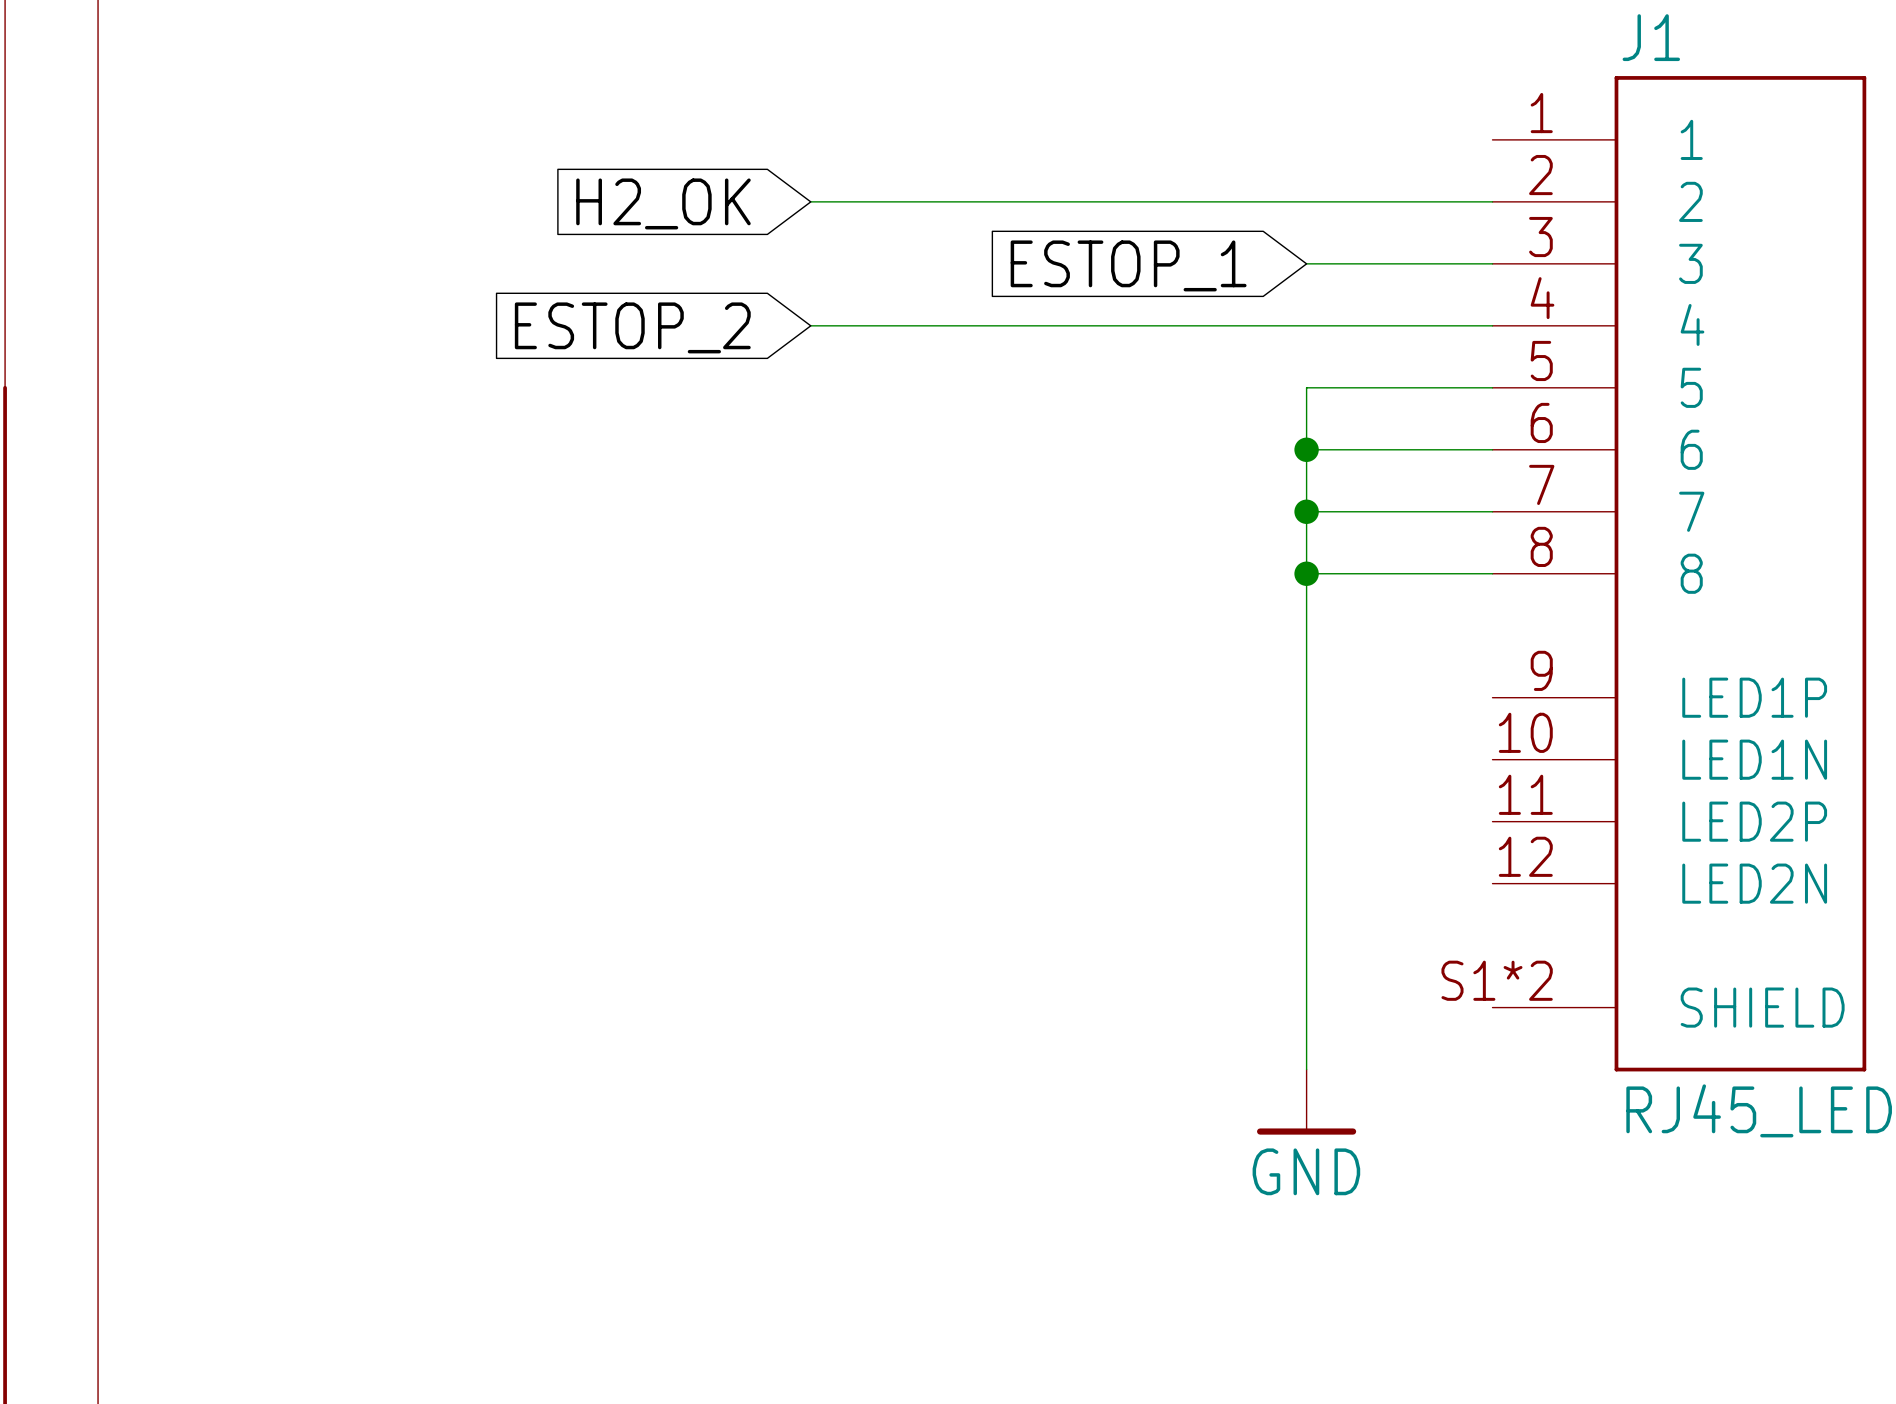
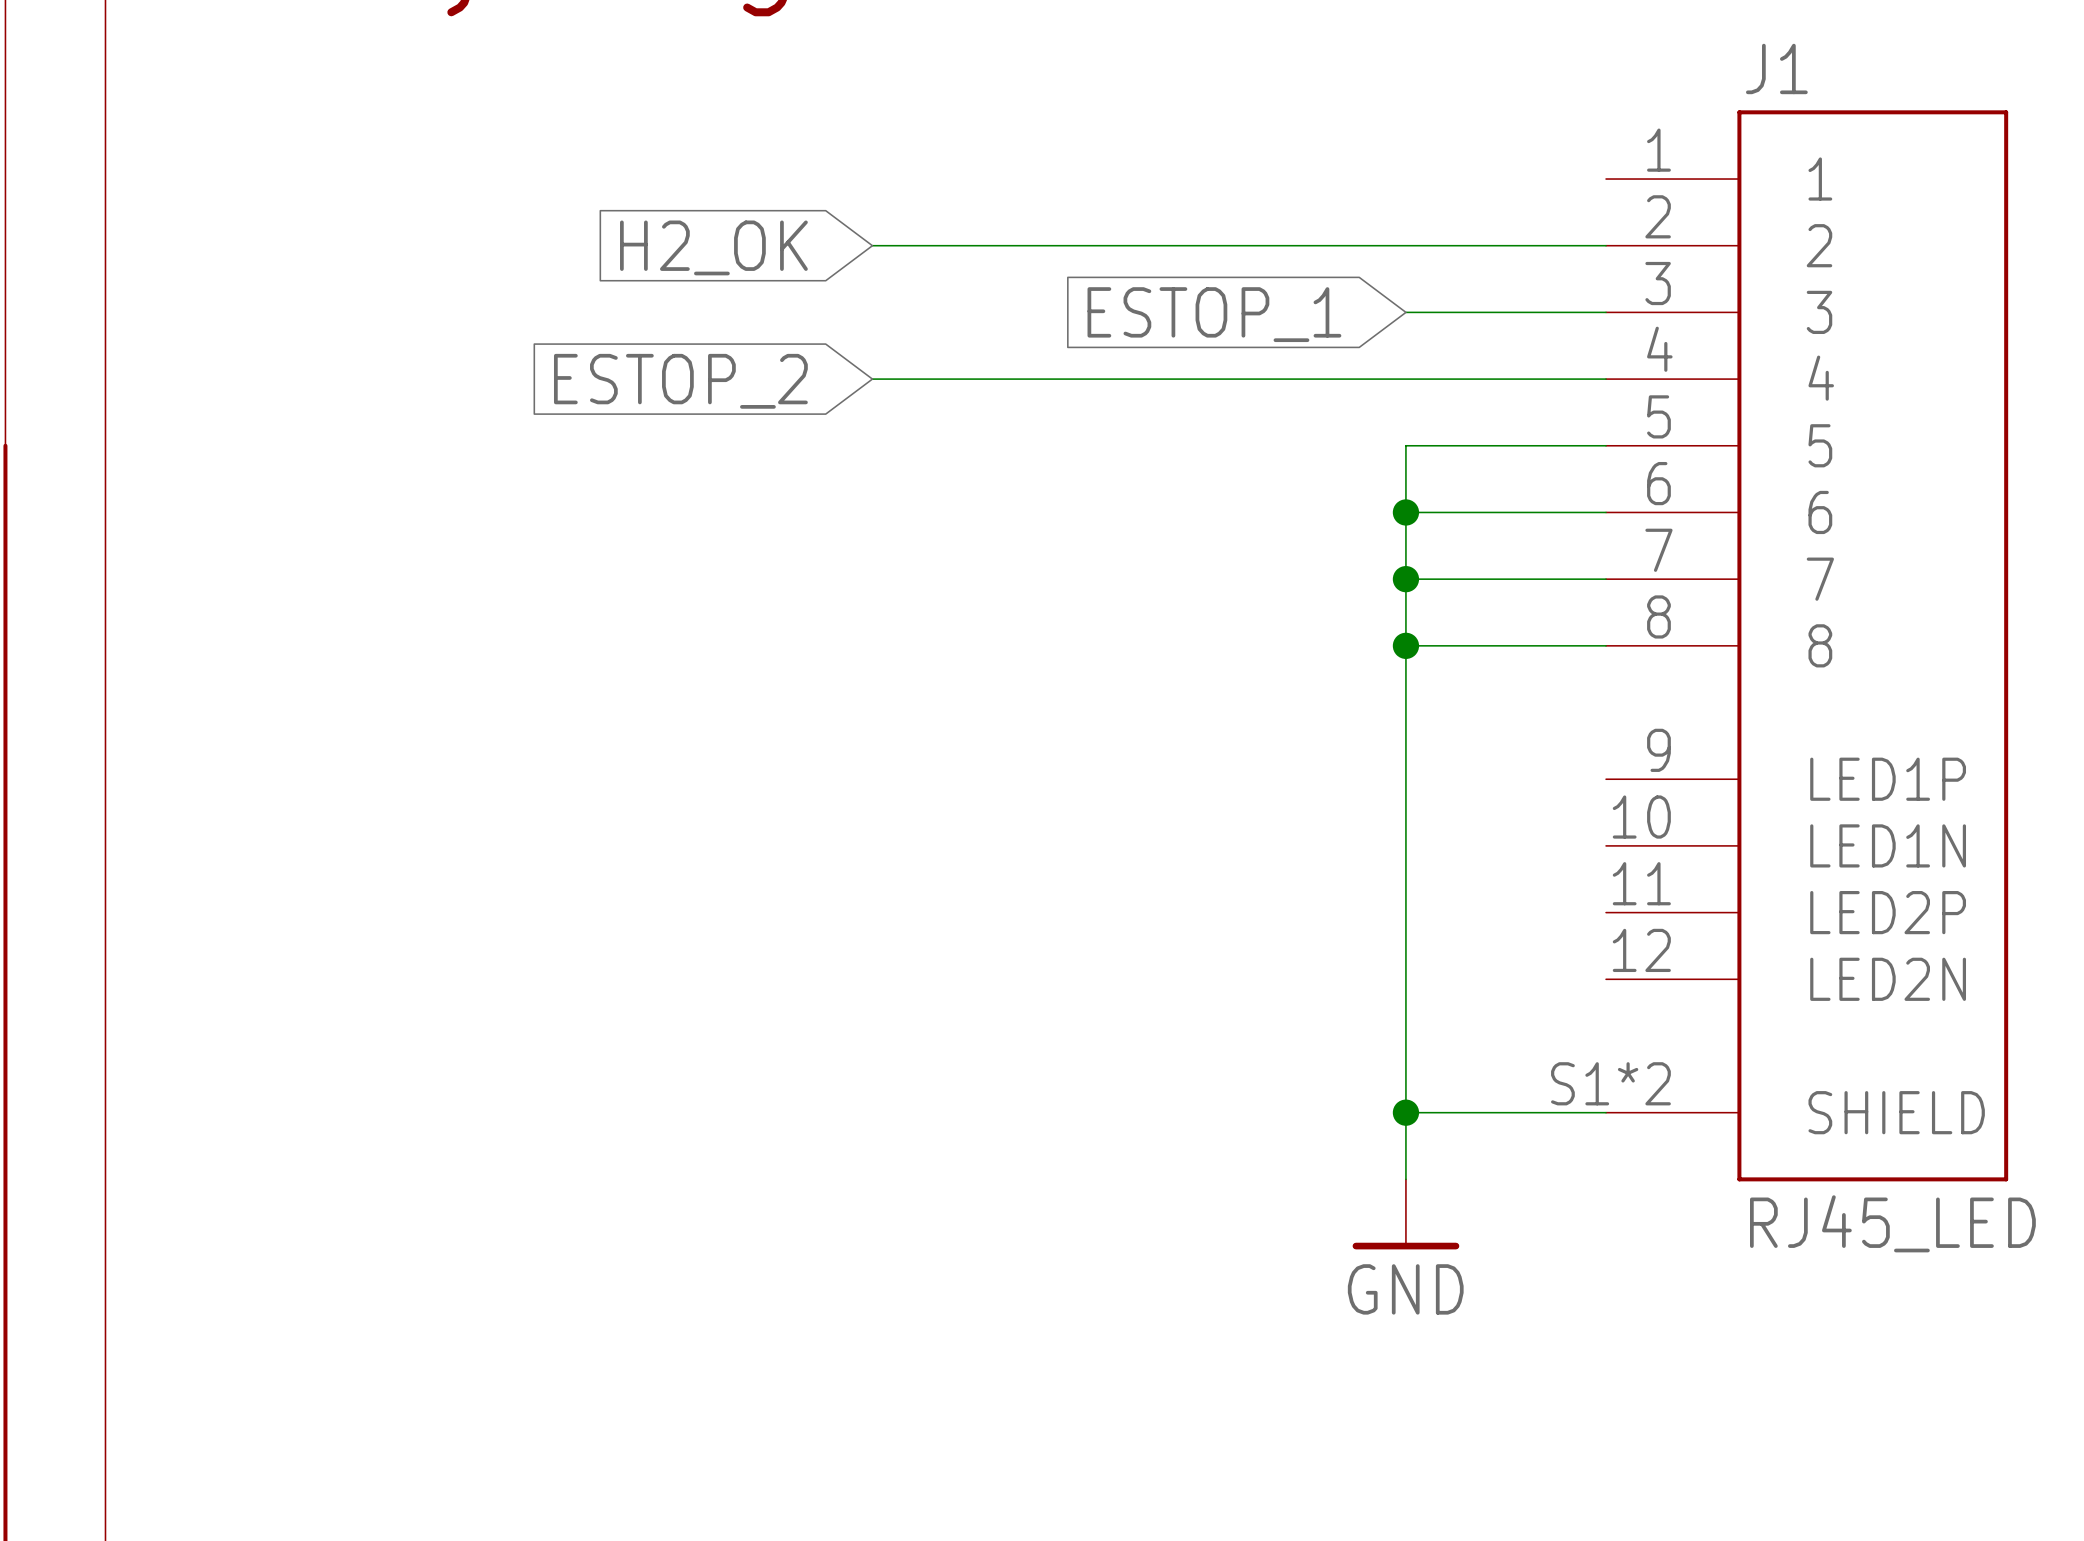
wire: none -> (1405, 1112) (1606, 1112)
junction: none -> (1405, 1112)

